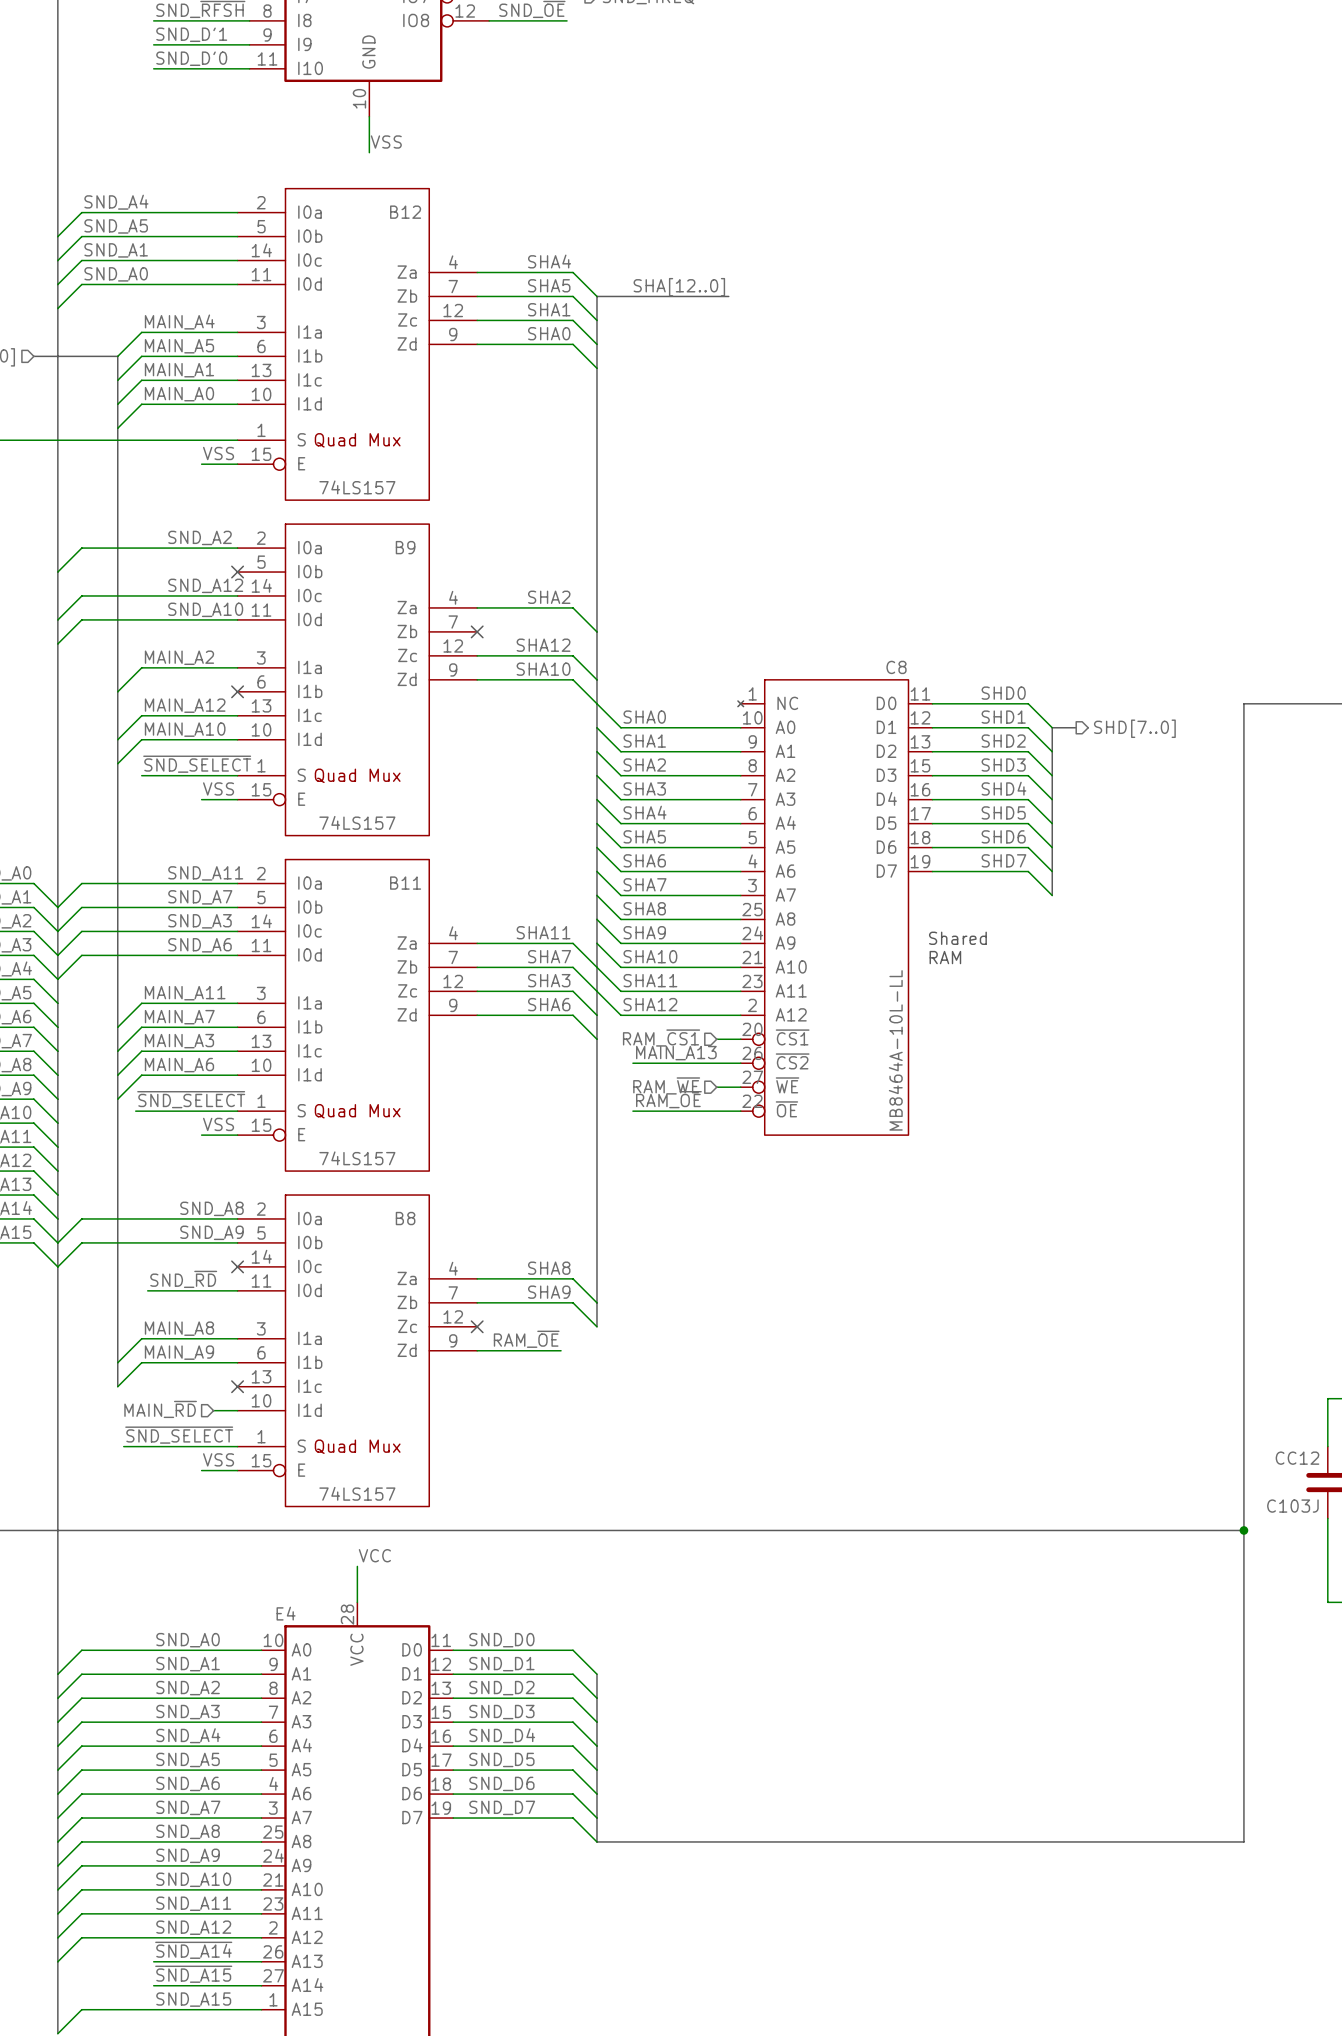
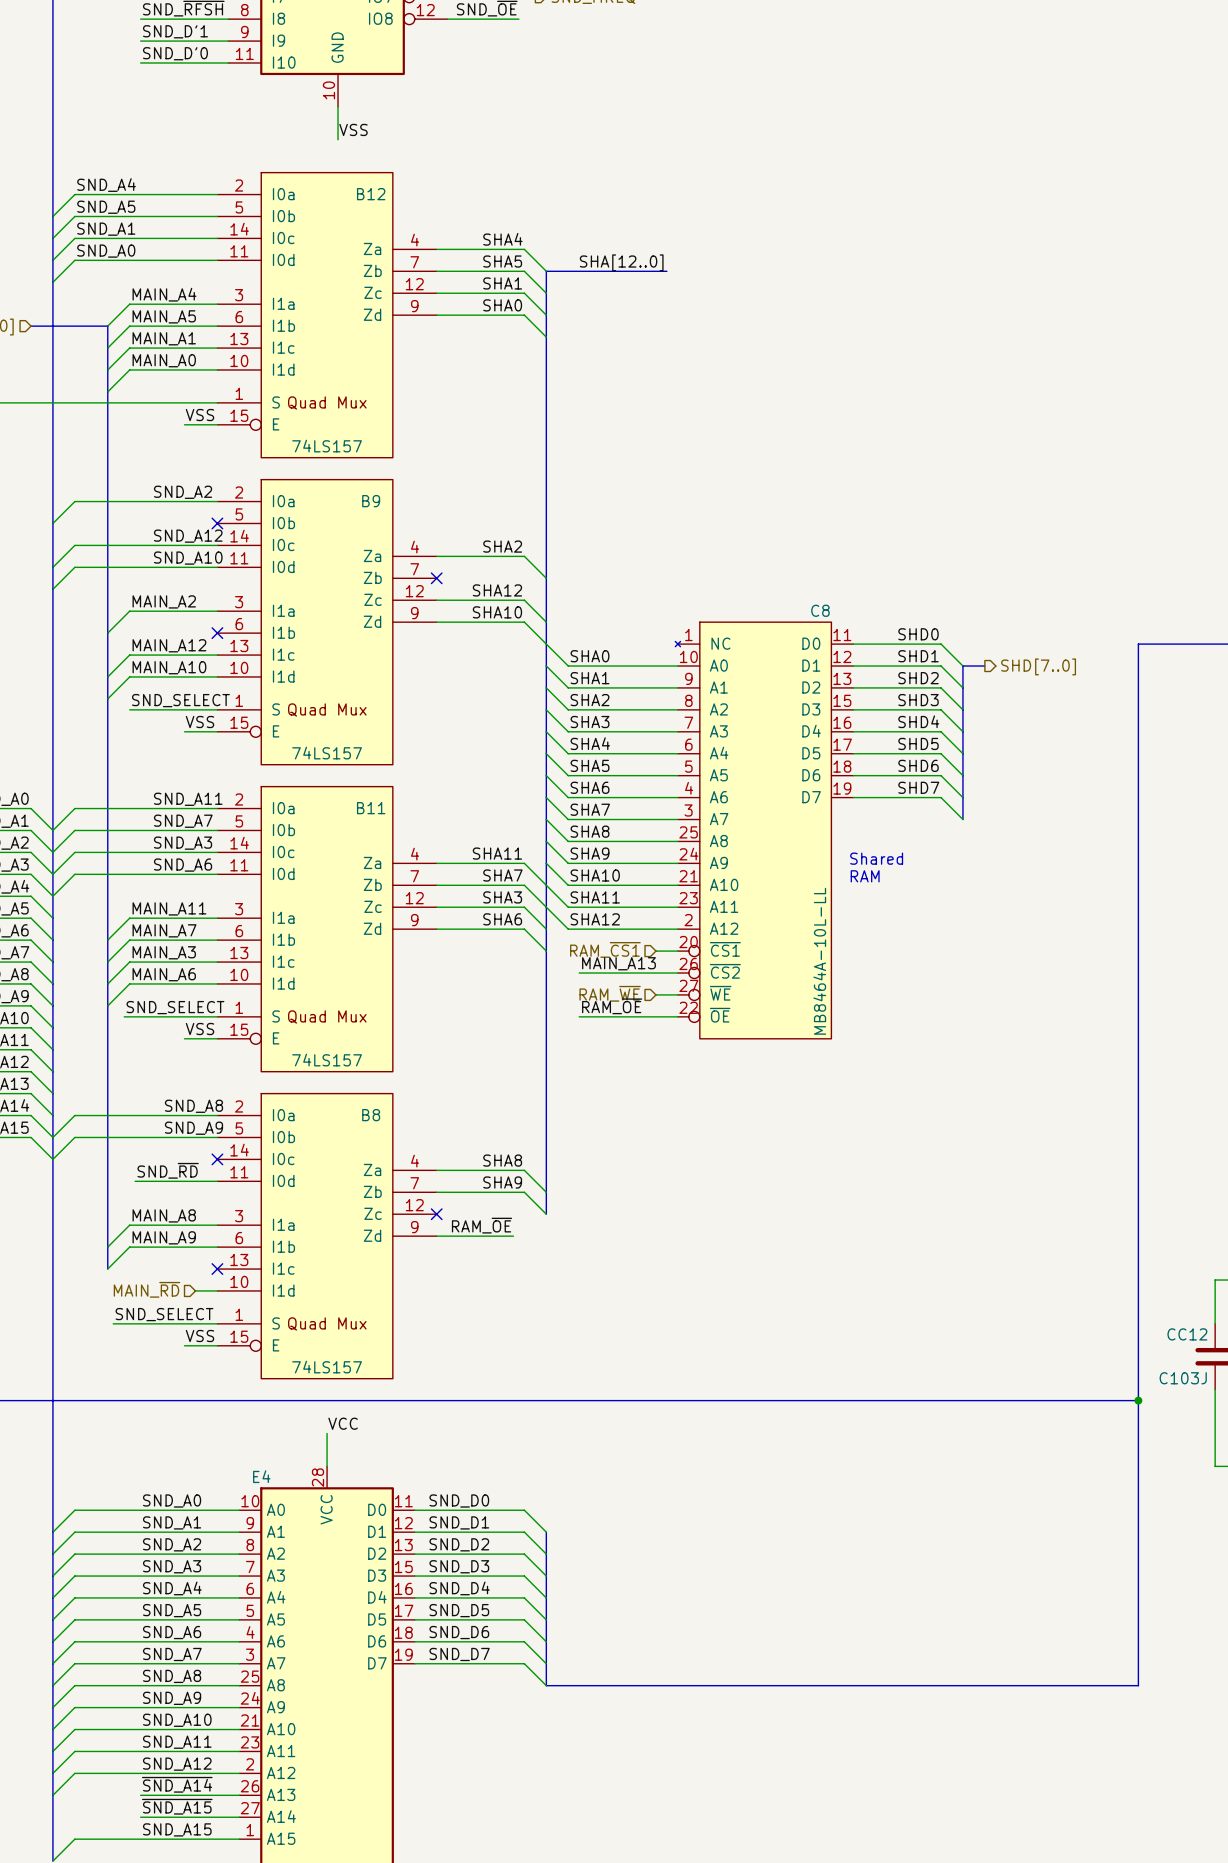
label: ~{SND_SELECT} (197, 764) -> SND_SELECT (180, 700)
label: ~{SND_SELECT} (191, 1099) -> SND_SELECT (175, 1007)
label: ~{SND_SELECT} (179, 1435) -> SND_SELECT (164, 1314)

